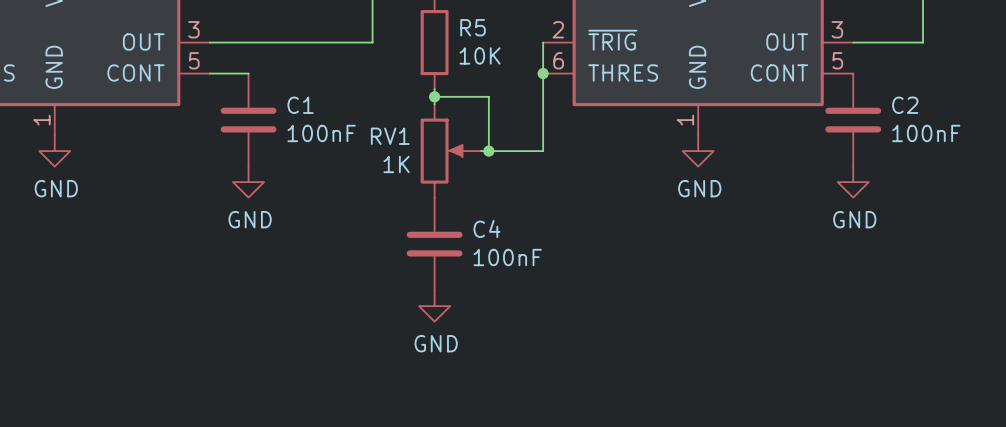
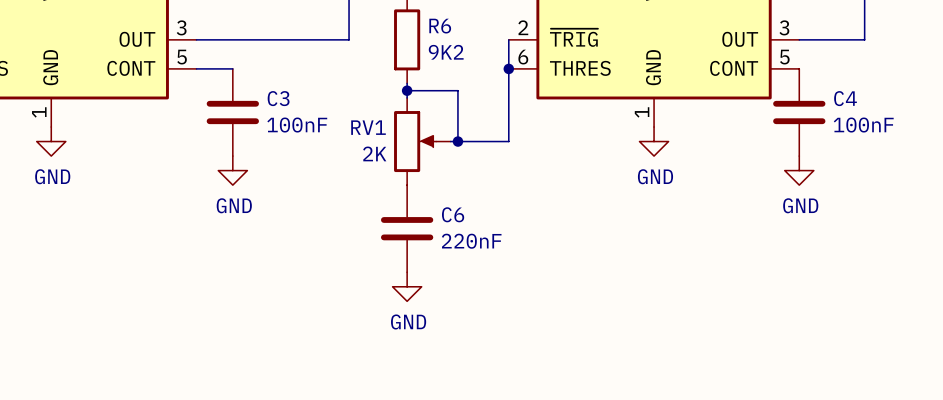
R5 name: R5 (473, 27) -> R6 (440, 26)
R5 value: 10K (480, 55) -> 9K2 (446, 52)
C1 name: C1 (300, 105) -> C3 (278, 98)
C2 name: C2 (905, 105) -> C4 (845, 98)
RV1 value: 1K (396, 164) -> 2K (374, 153)
C4 name: C4 (486, 228) -> C6 (453, 214)
C4 value: 100nF (507, 257) -> 220nF (471, 241)

